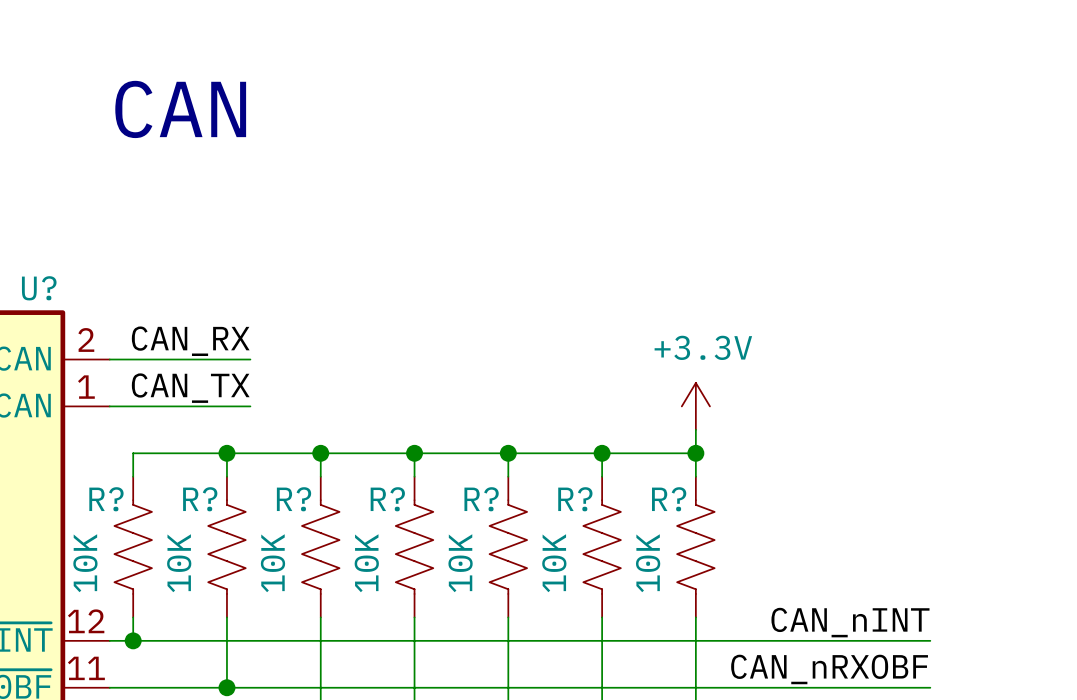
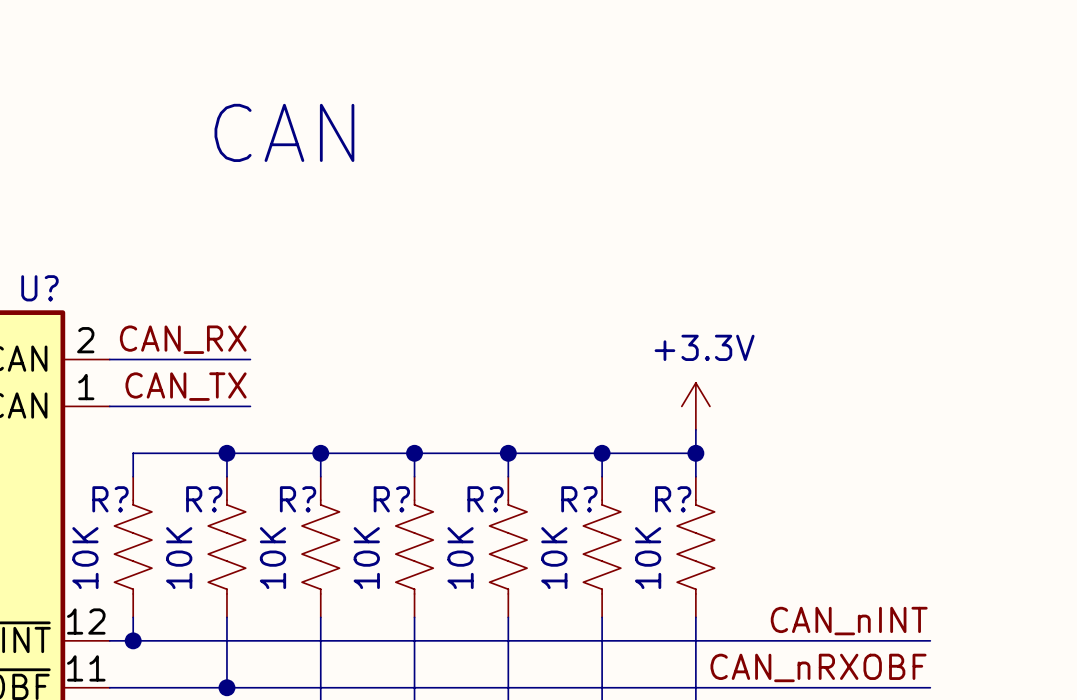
text position: CAN (180, 109) -> CAN (284, 132)

